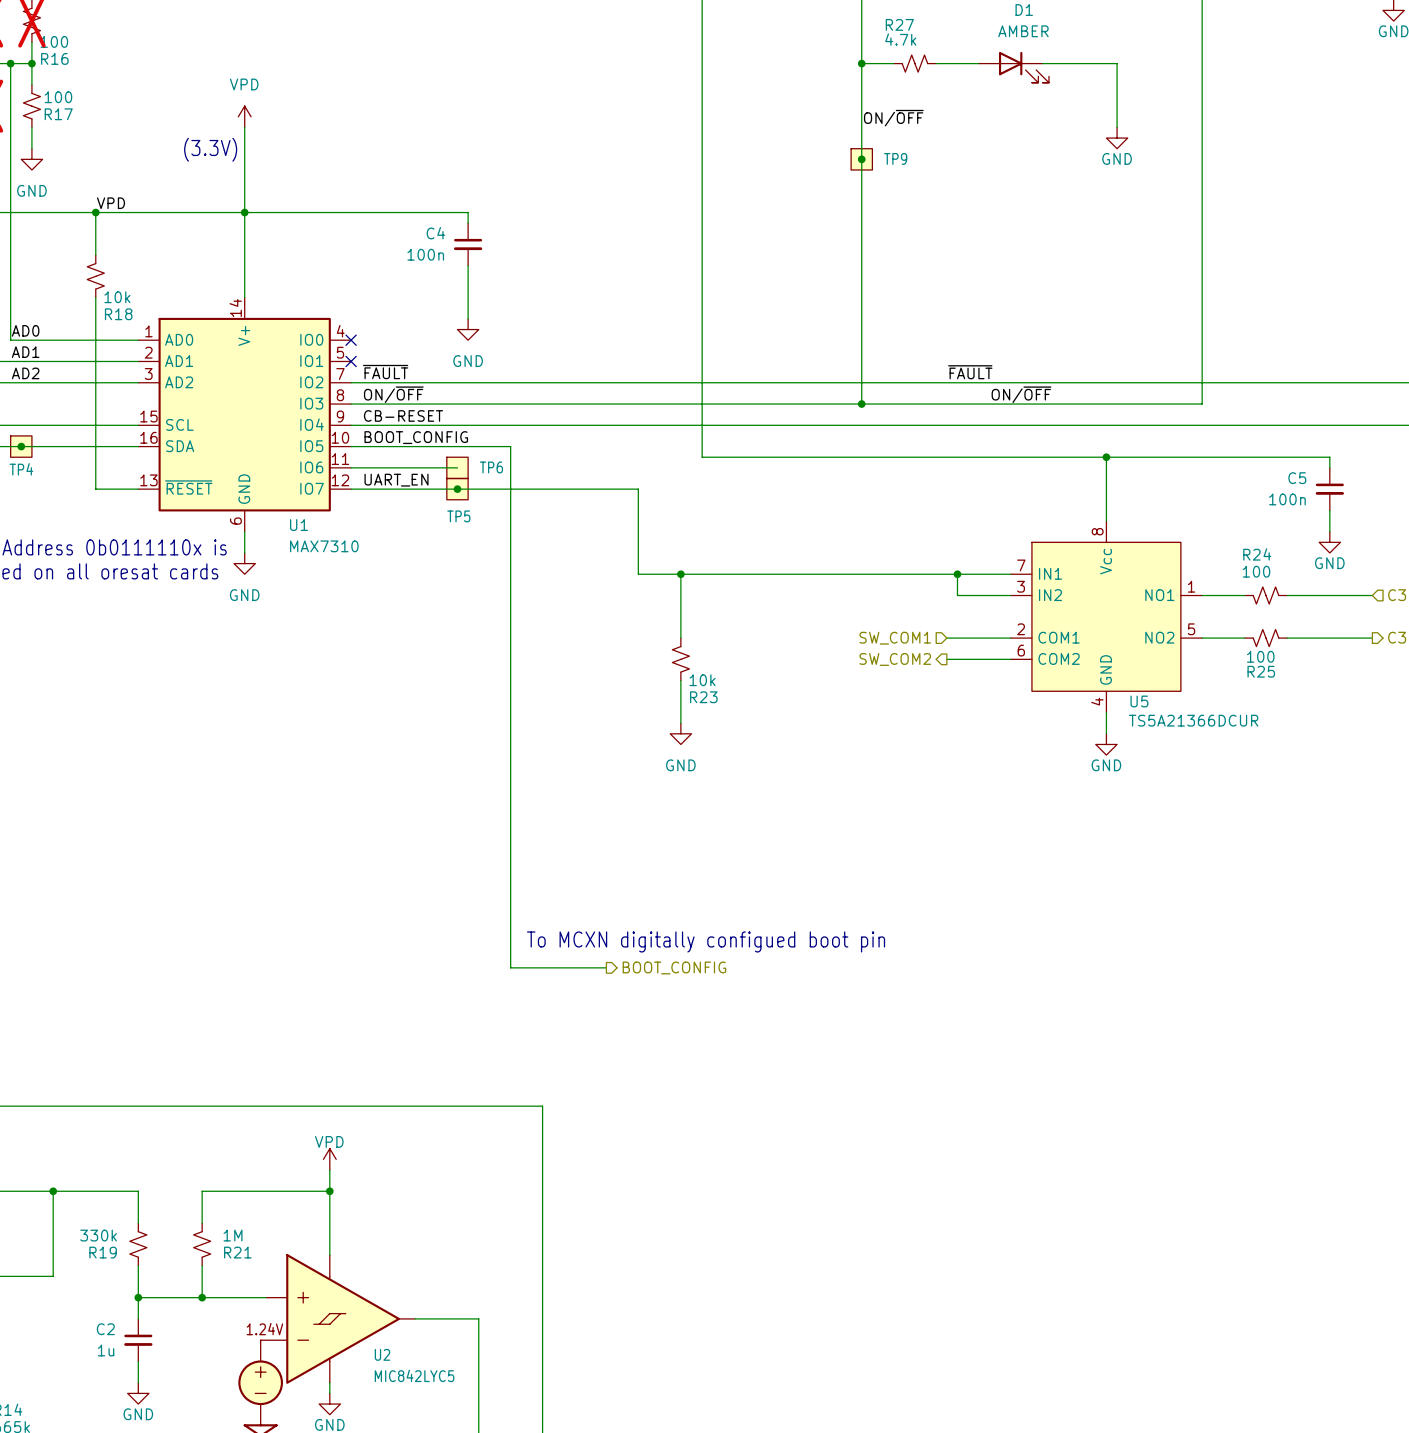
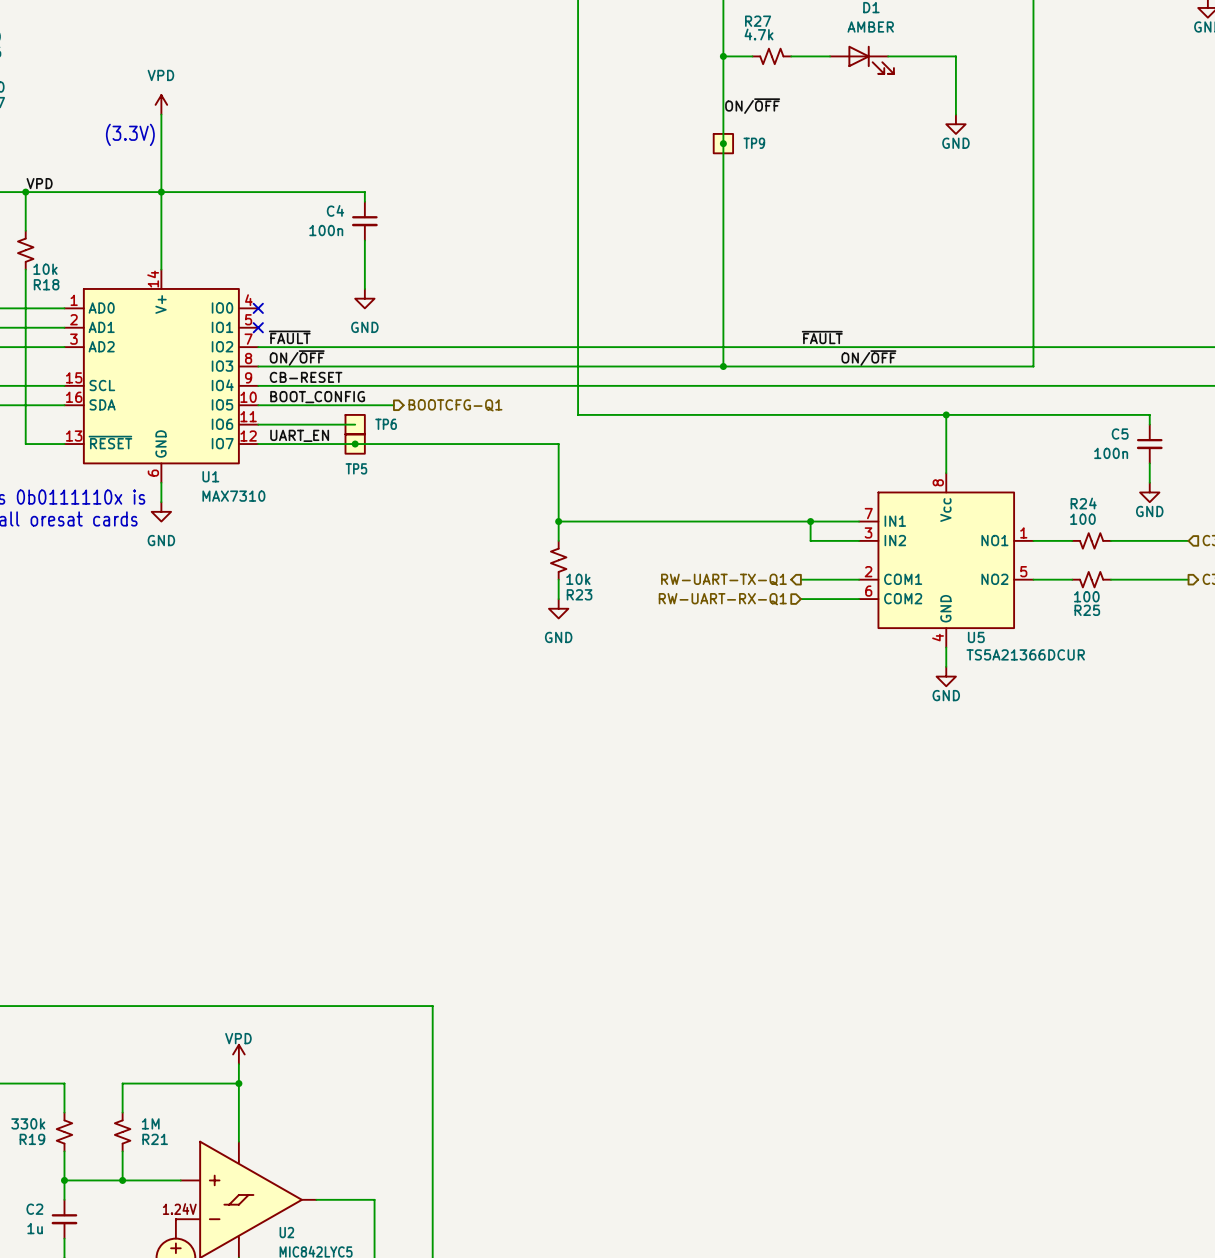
wire: (500, 446) (510, 446) (510, 967) (606, 967) -> none
hierarchical label: none -> BOOTCFG-Q1 (455, 405)
wire: (638, 489) (638, 574) (680, 574) -> (519, 444) (558, 444) (558, 521)
hierarchical label shape: input (895, 638) -> output (723, 579)
hierarchical label: SW_COM1 (895, 638) -> RW-UART-TX-Q1 (723, 579)
R23 position: (680, 659) -> (558, 560)
hierarchical label shape: output (895, 659) -> input (722, 599)
hierarchical label: SW_COM2 (895, 659) -> RW-UART-RX-Q1 (722, 599)
wire: (680, 680) (680, 723) -> none
power symbol position: GND (680, 733) -> GND (558, 608)
text: To MCXN digitally configued boot pin (706, 941) -> none
hierarchical label: BOOT_CONFIG (674, 967) -> none

